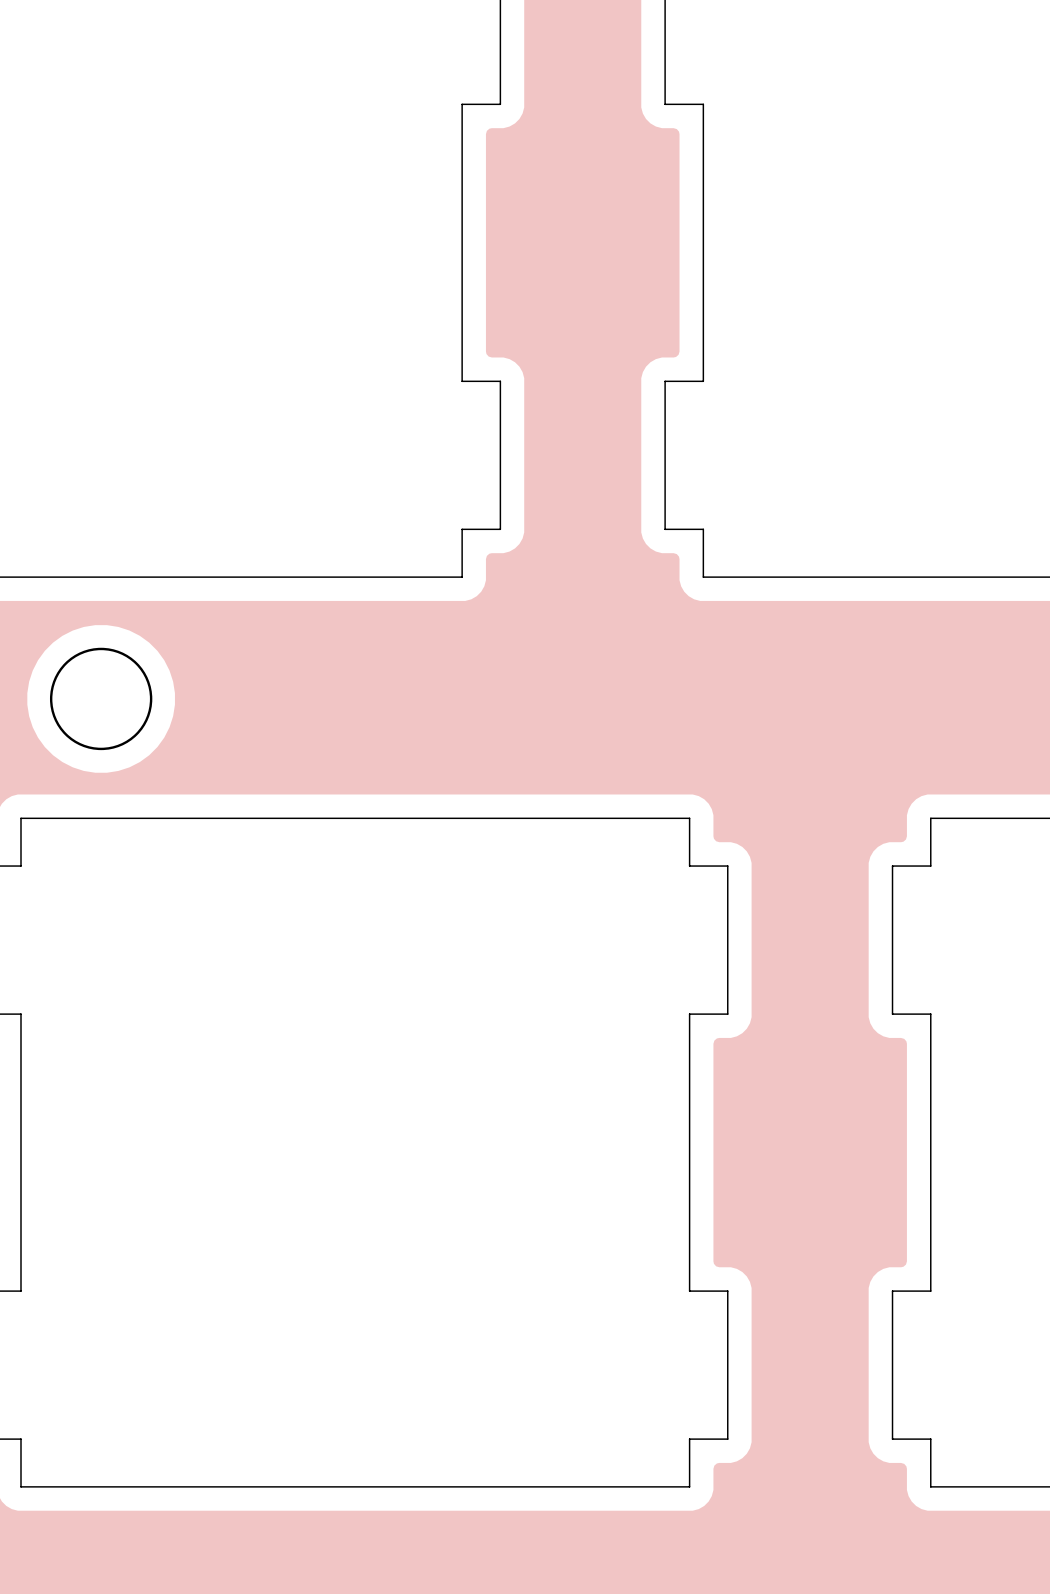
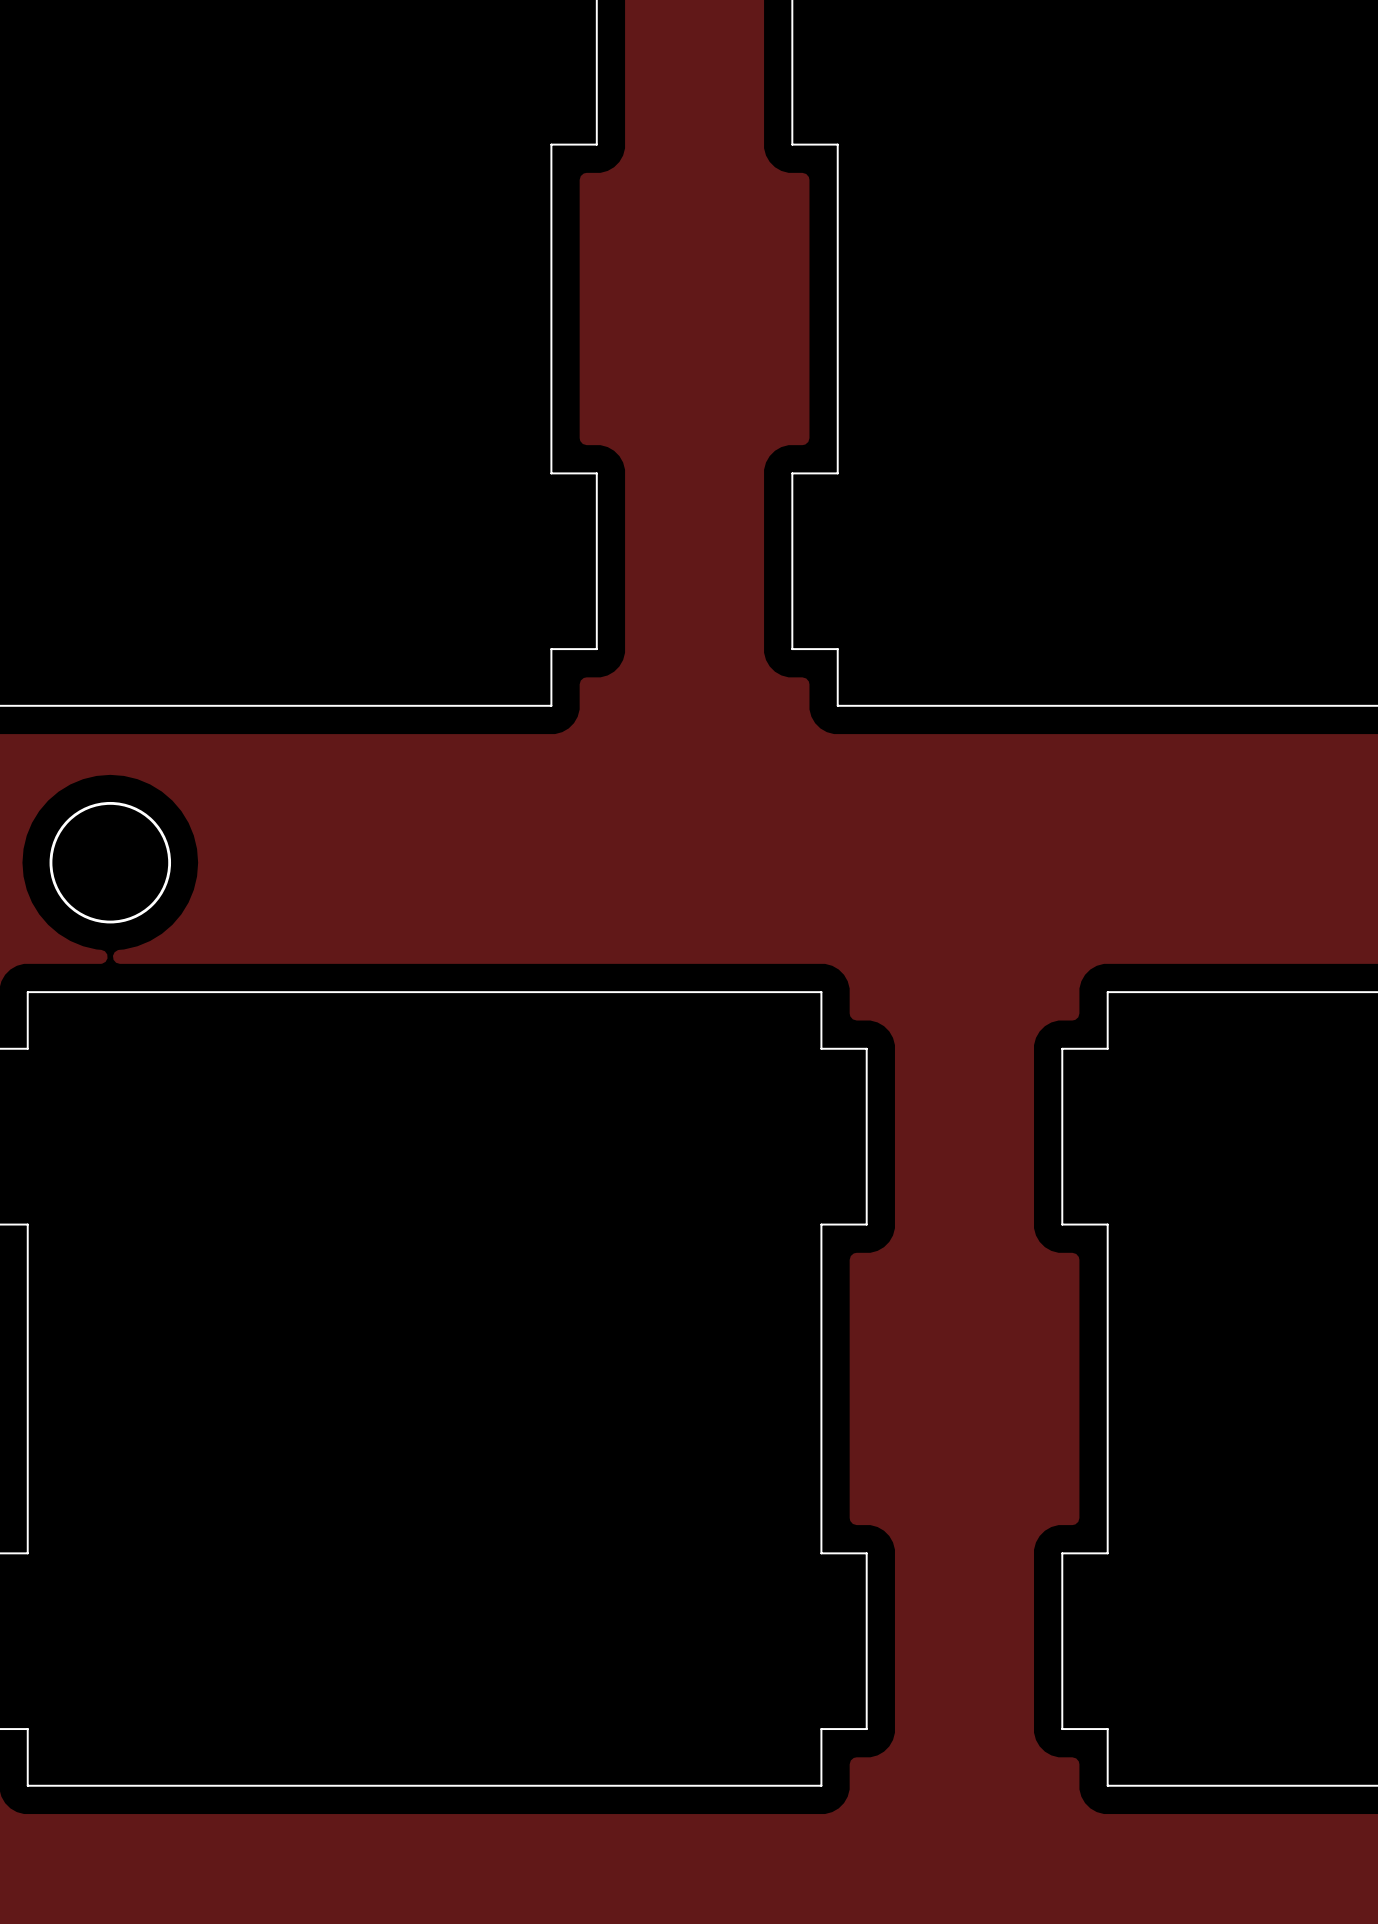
round board edge position: (101, 698) -> (110, 862)

